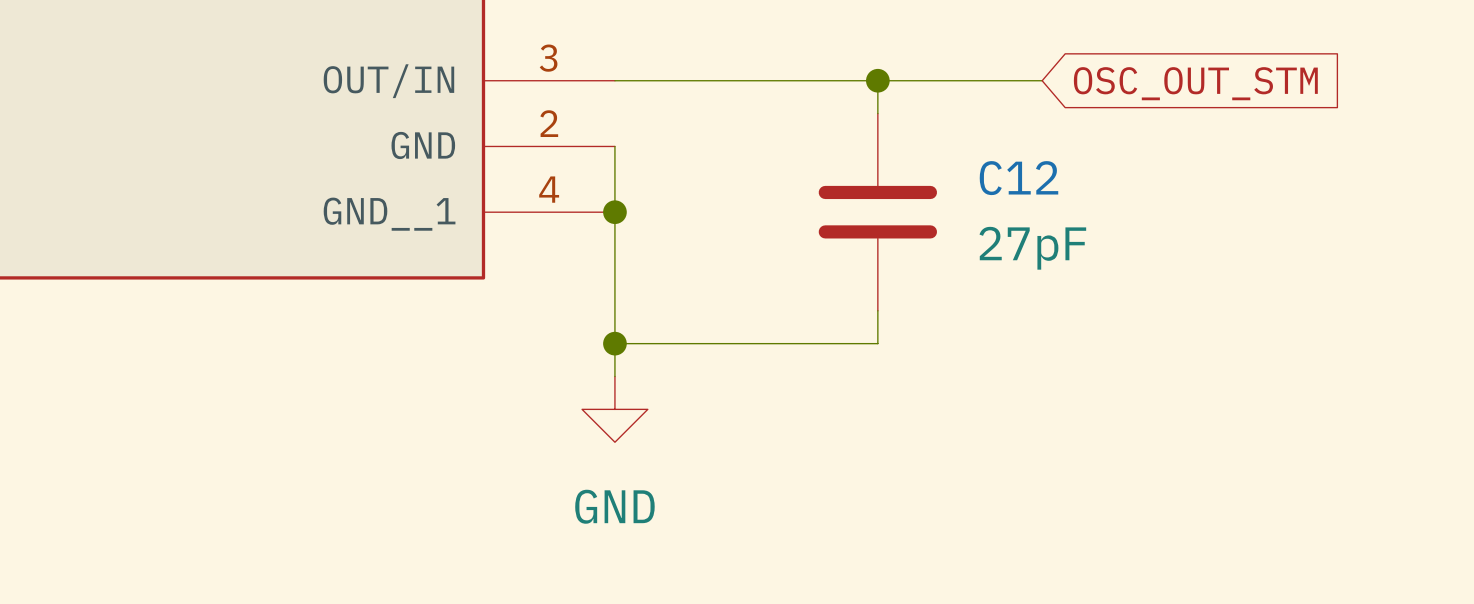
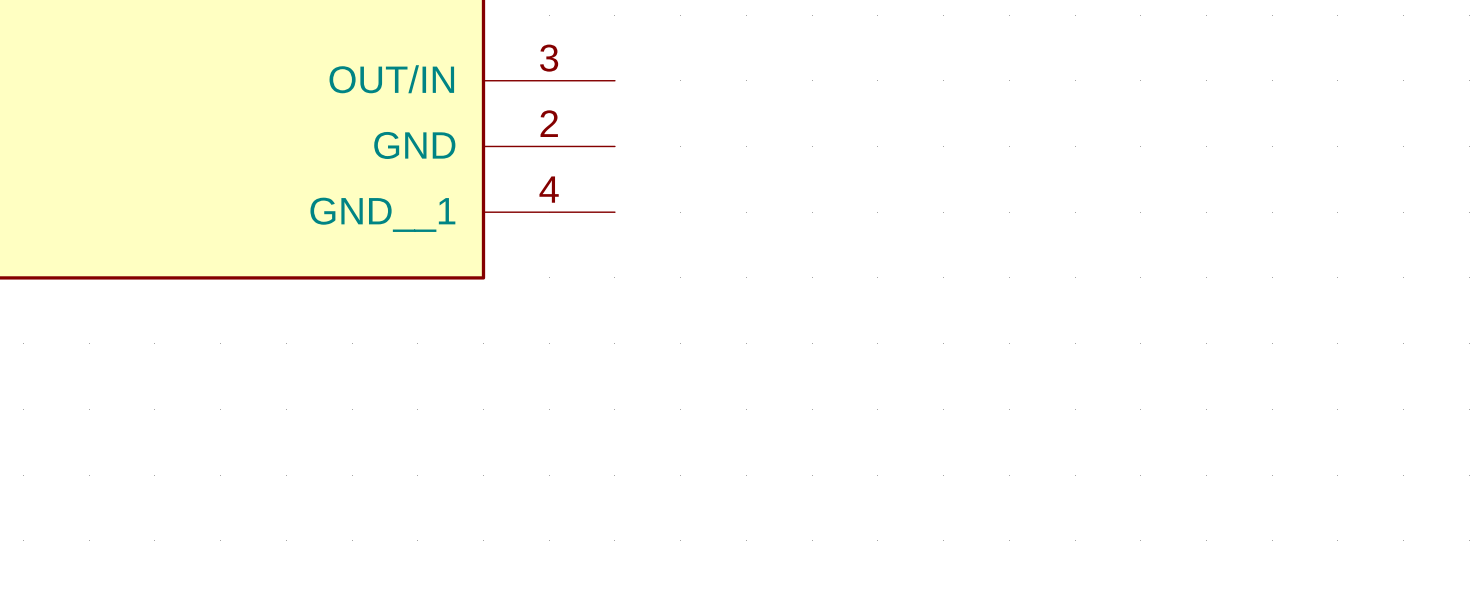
wire: (614, 80) (1042, 80) -> none
wire: (877, 80) (877, 113) -> none
junction: (877, 80) -> none
global label: OSC_OUT_STM (1195, 83) -> none
wire: (614, 146) (614, 376) -> none
junction: (614, 212) -> none
C12: 27pF (877, 212) -> none
wire: (877, 310) (877, 343) (614, 343) -> none
junction: (614, 343) -> none
power symbol: GND (614, 409) -> none

